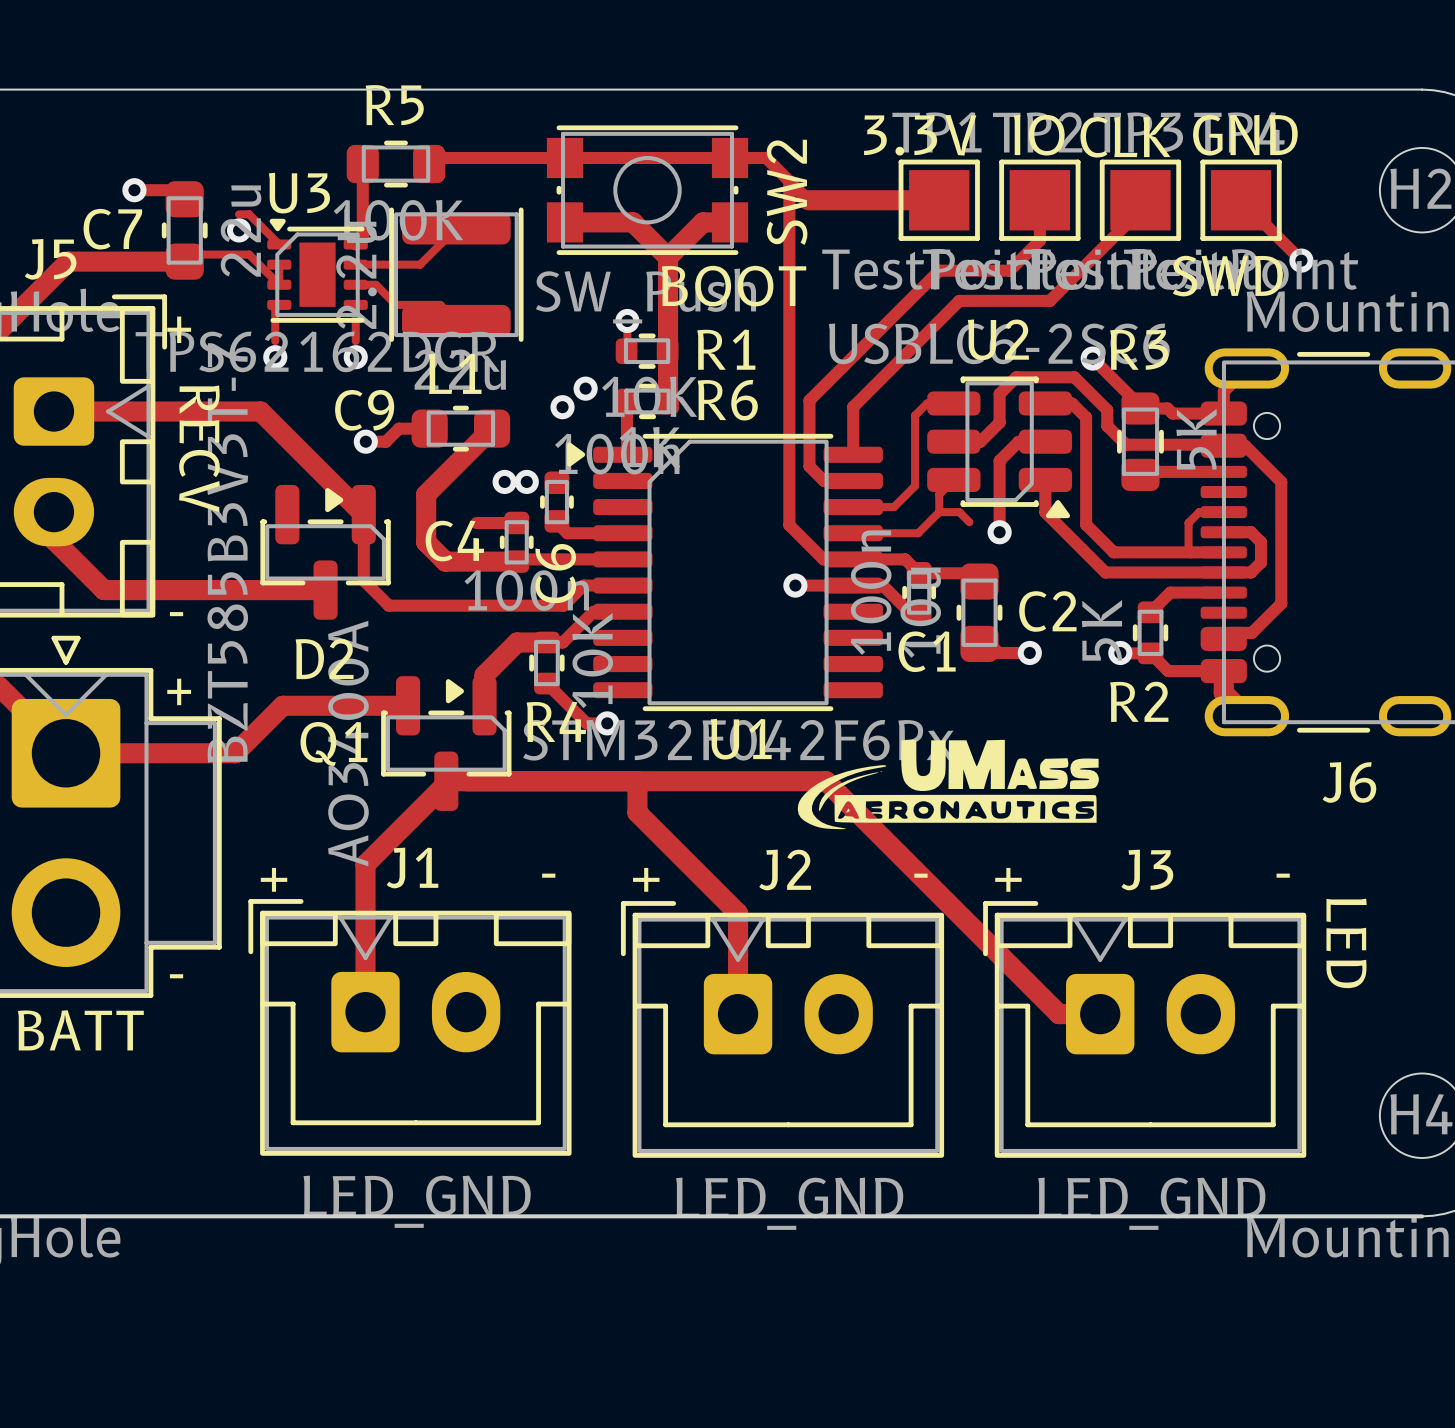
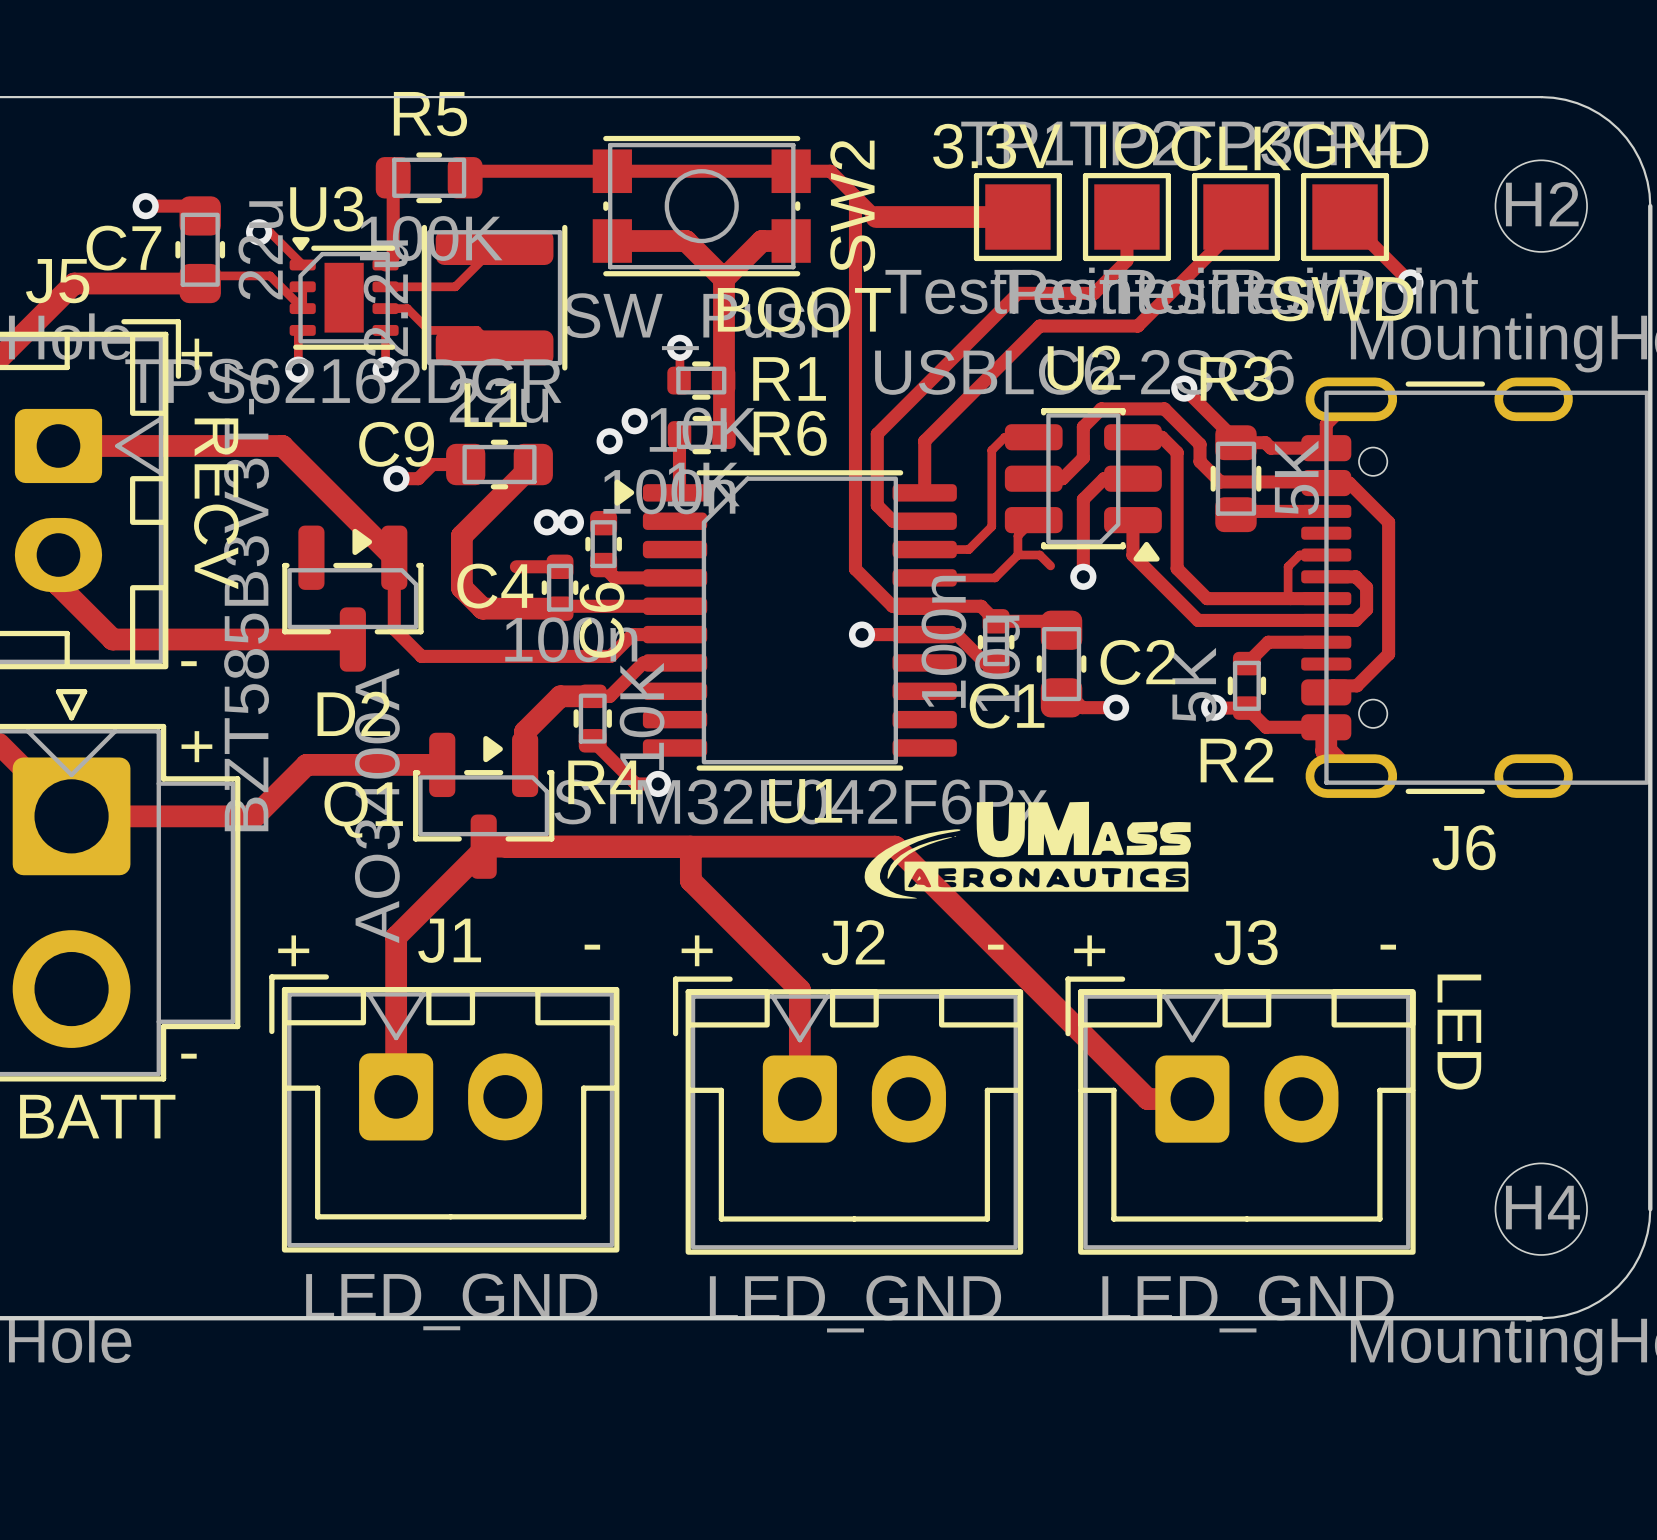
via position: (239, 230) -> (259, 232)
via position: (275, 357) -> (298, 369)
via position: (355, 357) -> (385, 369)

